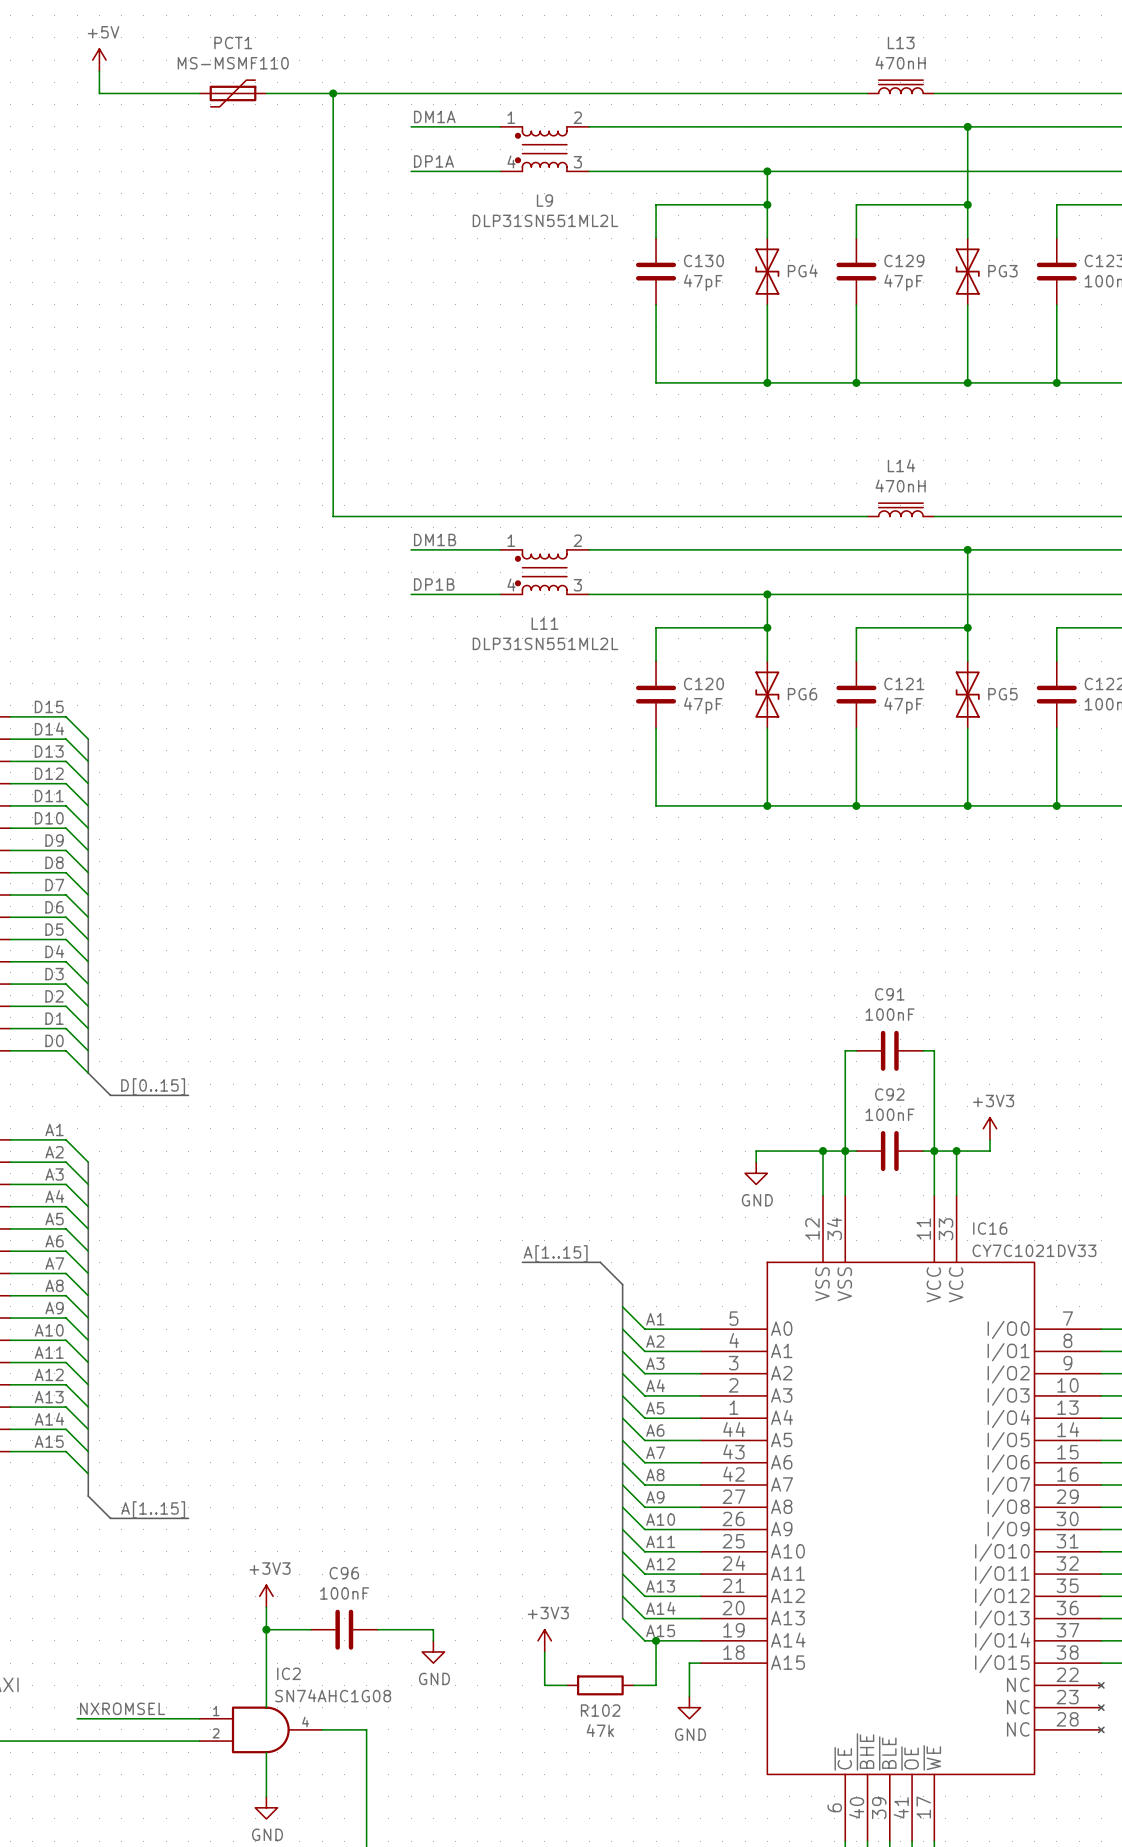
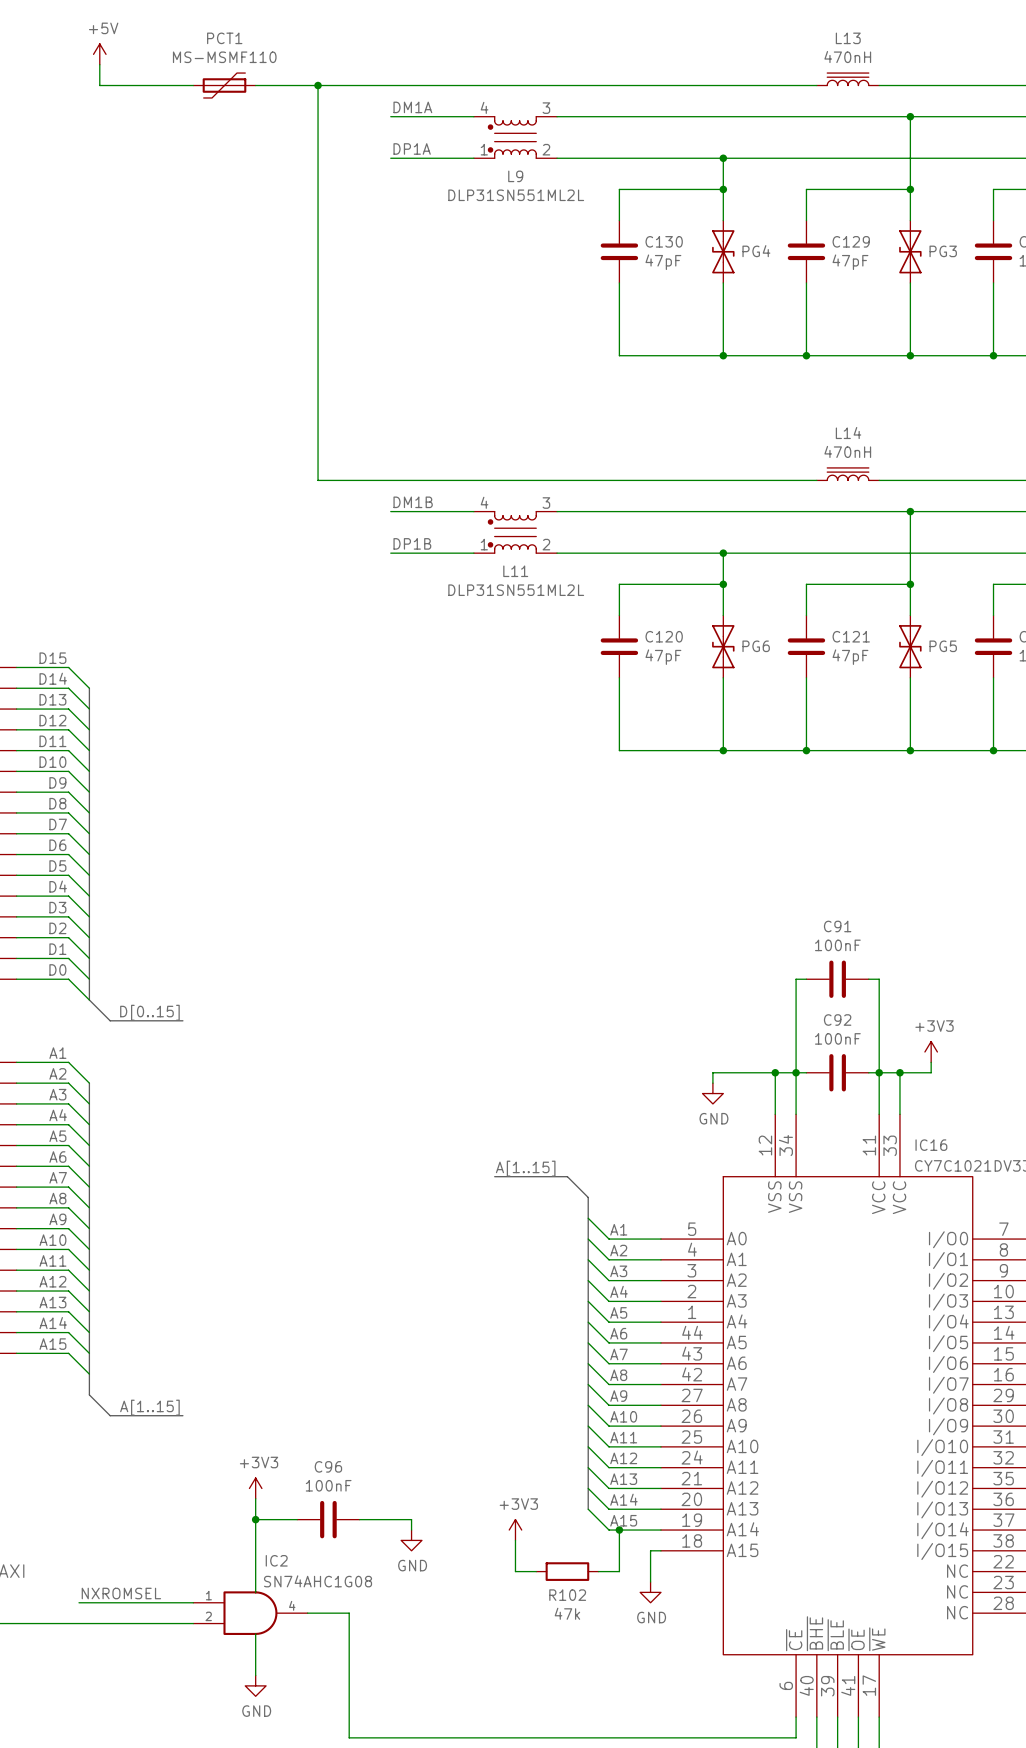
L9 flip: as is (541, 149) -> up-down (512, 137)
L11 flip: as is (541, 572) -> up-down (512, 532)

